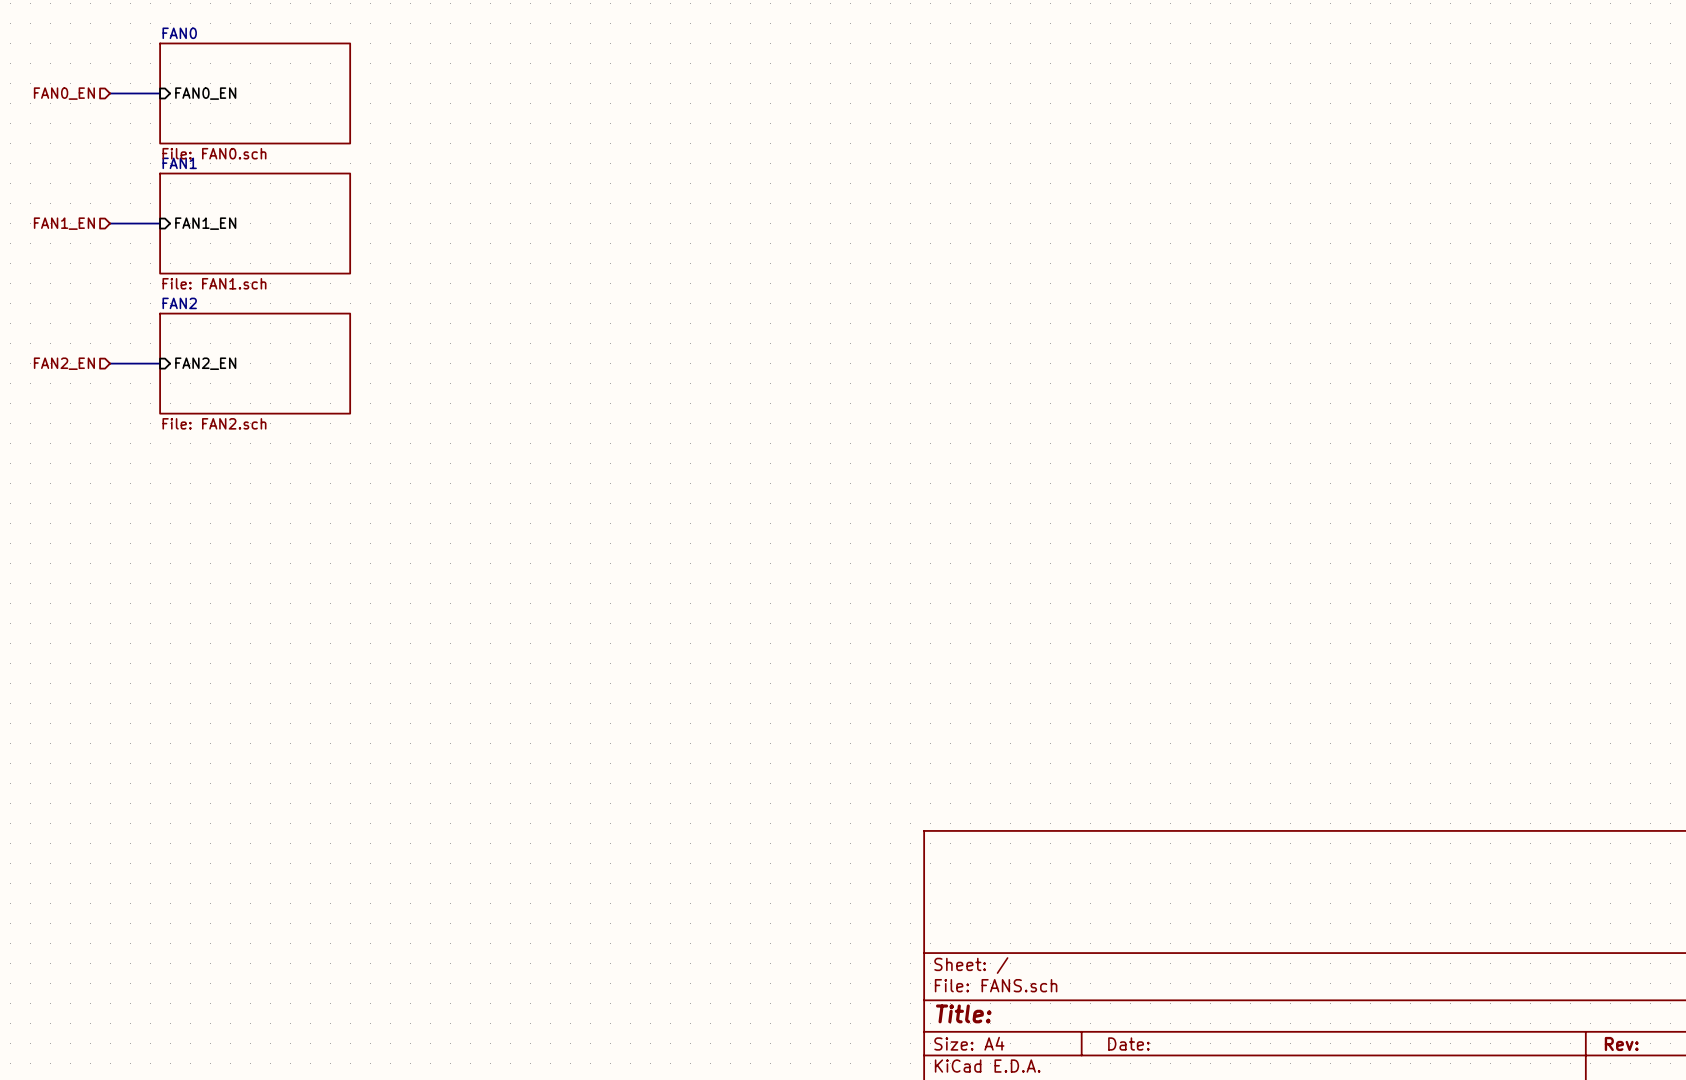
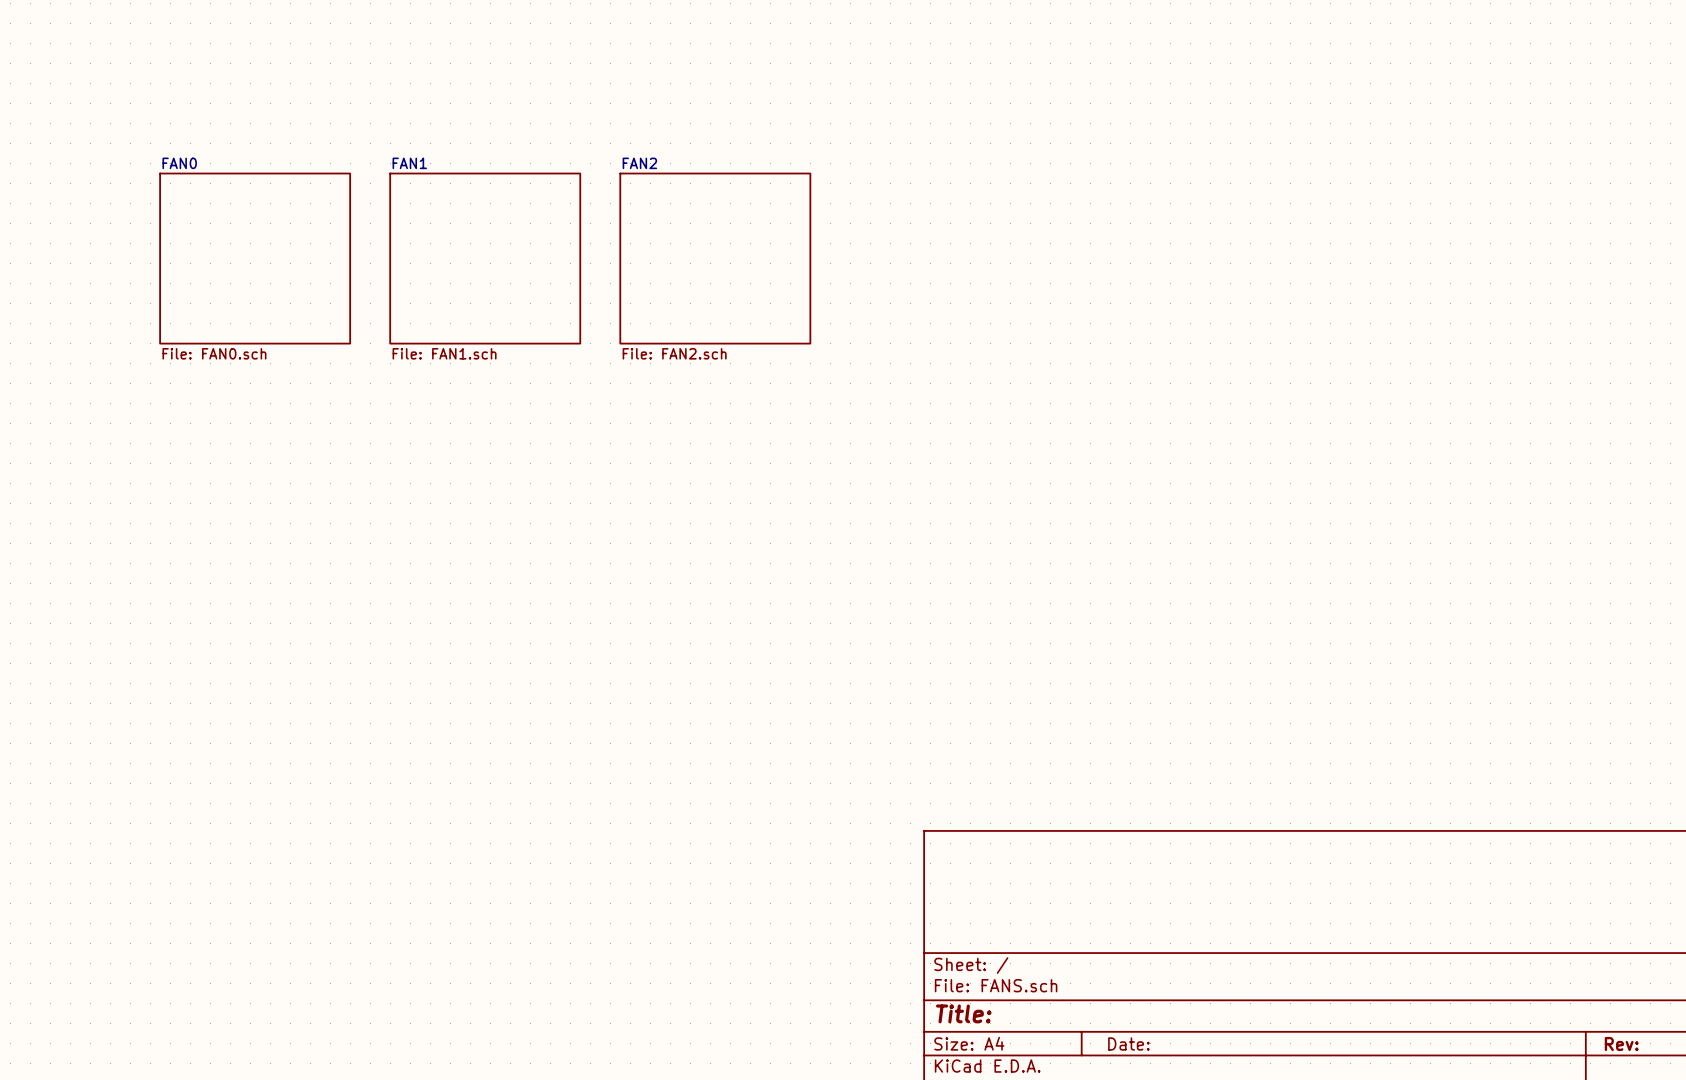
sheet FAN0 name position: FAN0 (179, 33) -> FAN0 (179, 163)
sheet FAN0 shape: [160, 43, 351, 144] -> [160, 173, 351, 344]
hierarchical label: FAN0_EN (64, 93) -> none
wire: (110, 93) (160, 93) -> none
sheet pin: FAN0_EN (205, 93) -> none
sheet FAN0 value position: File: FAN0.sch (214, 153) -> File: FAN0.sch (214, 353)
sheet FAN1 name position: FAN1 (179, 163) -> FAN1 (409, 163)
sheet FAN1 shape: [160, 173, 351, 274] -> [390, 173, 581, 344]
hierarchical label: FAN1_EN (64, 223) -> none
wire: (110, 223) (160, 223) -> none
sheet pin: FAN1_EN (205, 223) -> none
sheet FAN1 value position: File: FAN1.sch (214, 283) -> File: FAN1.sch (444, 353)
sheet FAN2 name position: FAN2 (179, 303) -> FAN2 (639, 163)
sheet FAN2 shape: [160, 313, 351, 414] -> [620, 173, 811, 344]
hierarchical label: FAN2_EN (64, 363) -> none
wire: (110, 363) (160, 363) -> none
sheet pin: FAN2_EN (205, 363) -> none
sheet FAN2 value position: File: FAN2.sch (214, 423) -> File: FAN2.sch (674, 353)

